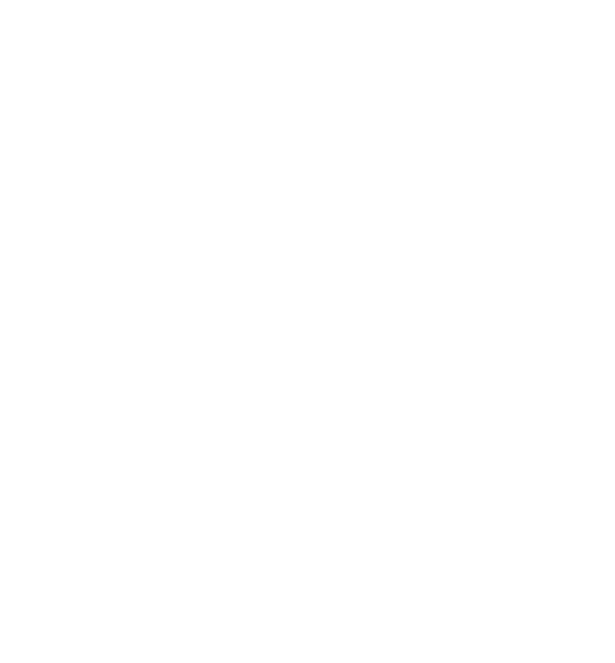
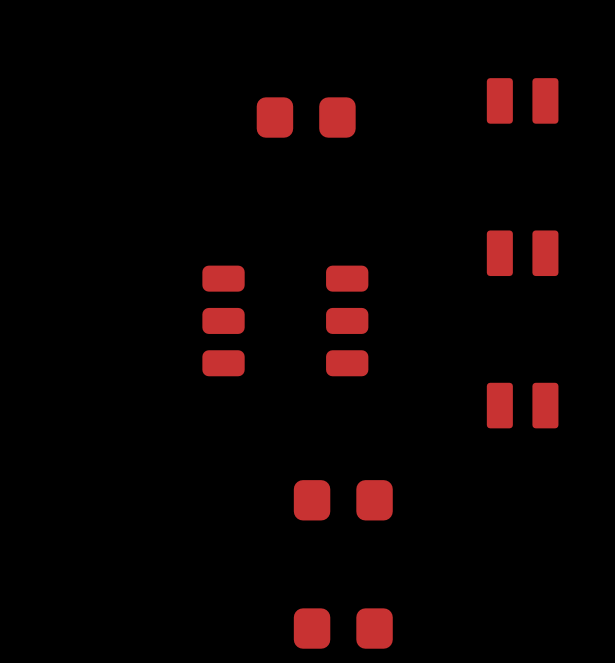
part: none -> (522, 100)
part: none -> (306, 117)
part: none -> (522, 253)
part: none -> (285, 320)
part: none -> (522, 405)
part: none -> (343, 500)
part: none -> (343, 628)

